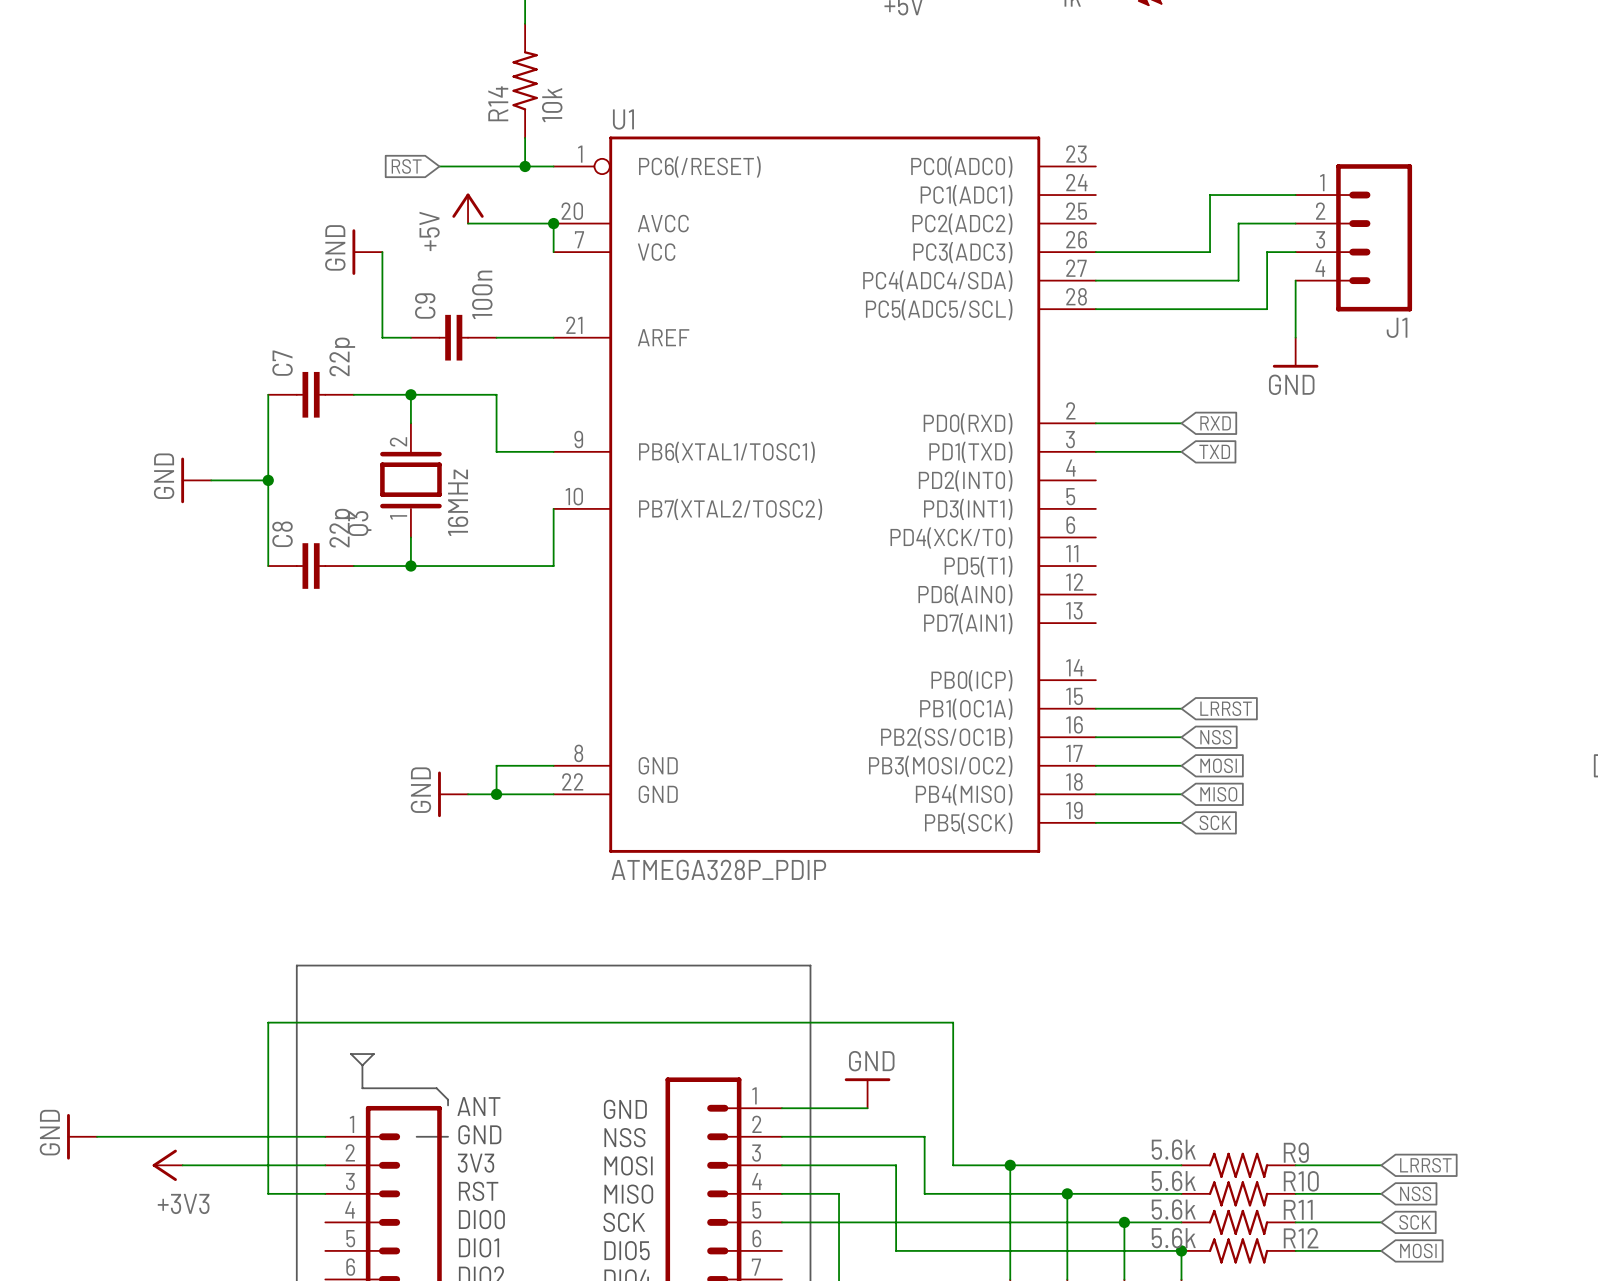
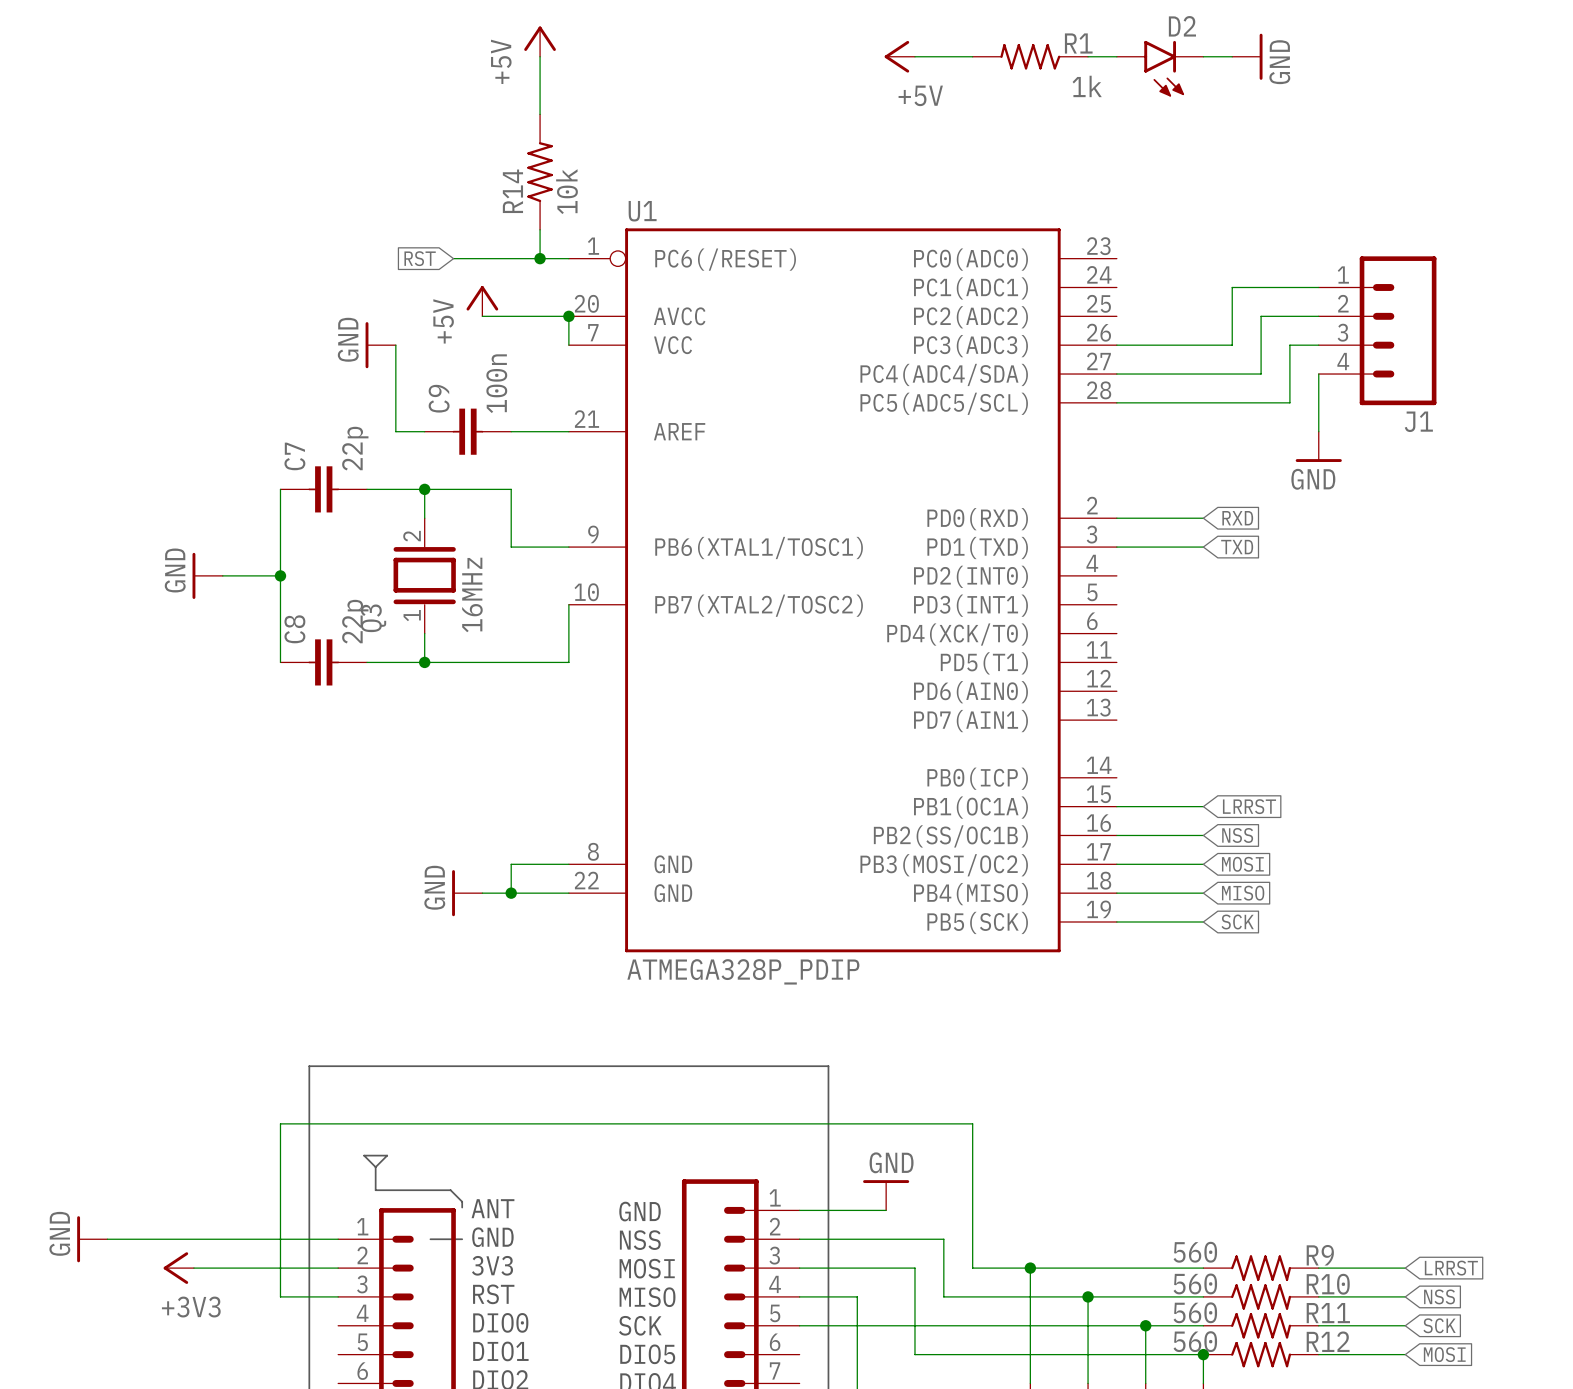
R9 value: 5.6k (1173, 1149) -> 560 (1195, 1252)
R10 value: 5.6k (1173, 1181) -> 560 (1195, 1283)
R11 value: 5.6k (1173, 1209) -> 560 (1195, 1312)
R12 value: 5.6k (1173, 1238) -> 560 (1195, 1341)

